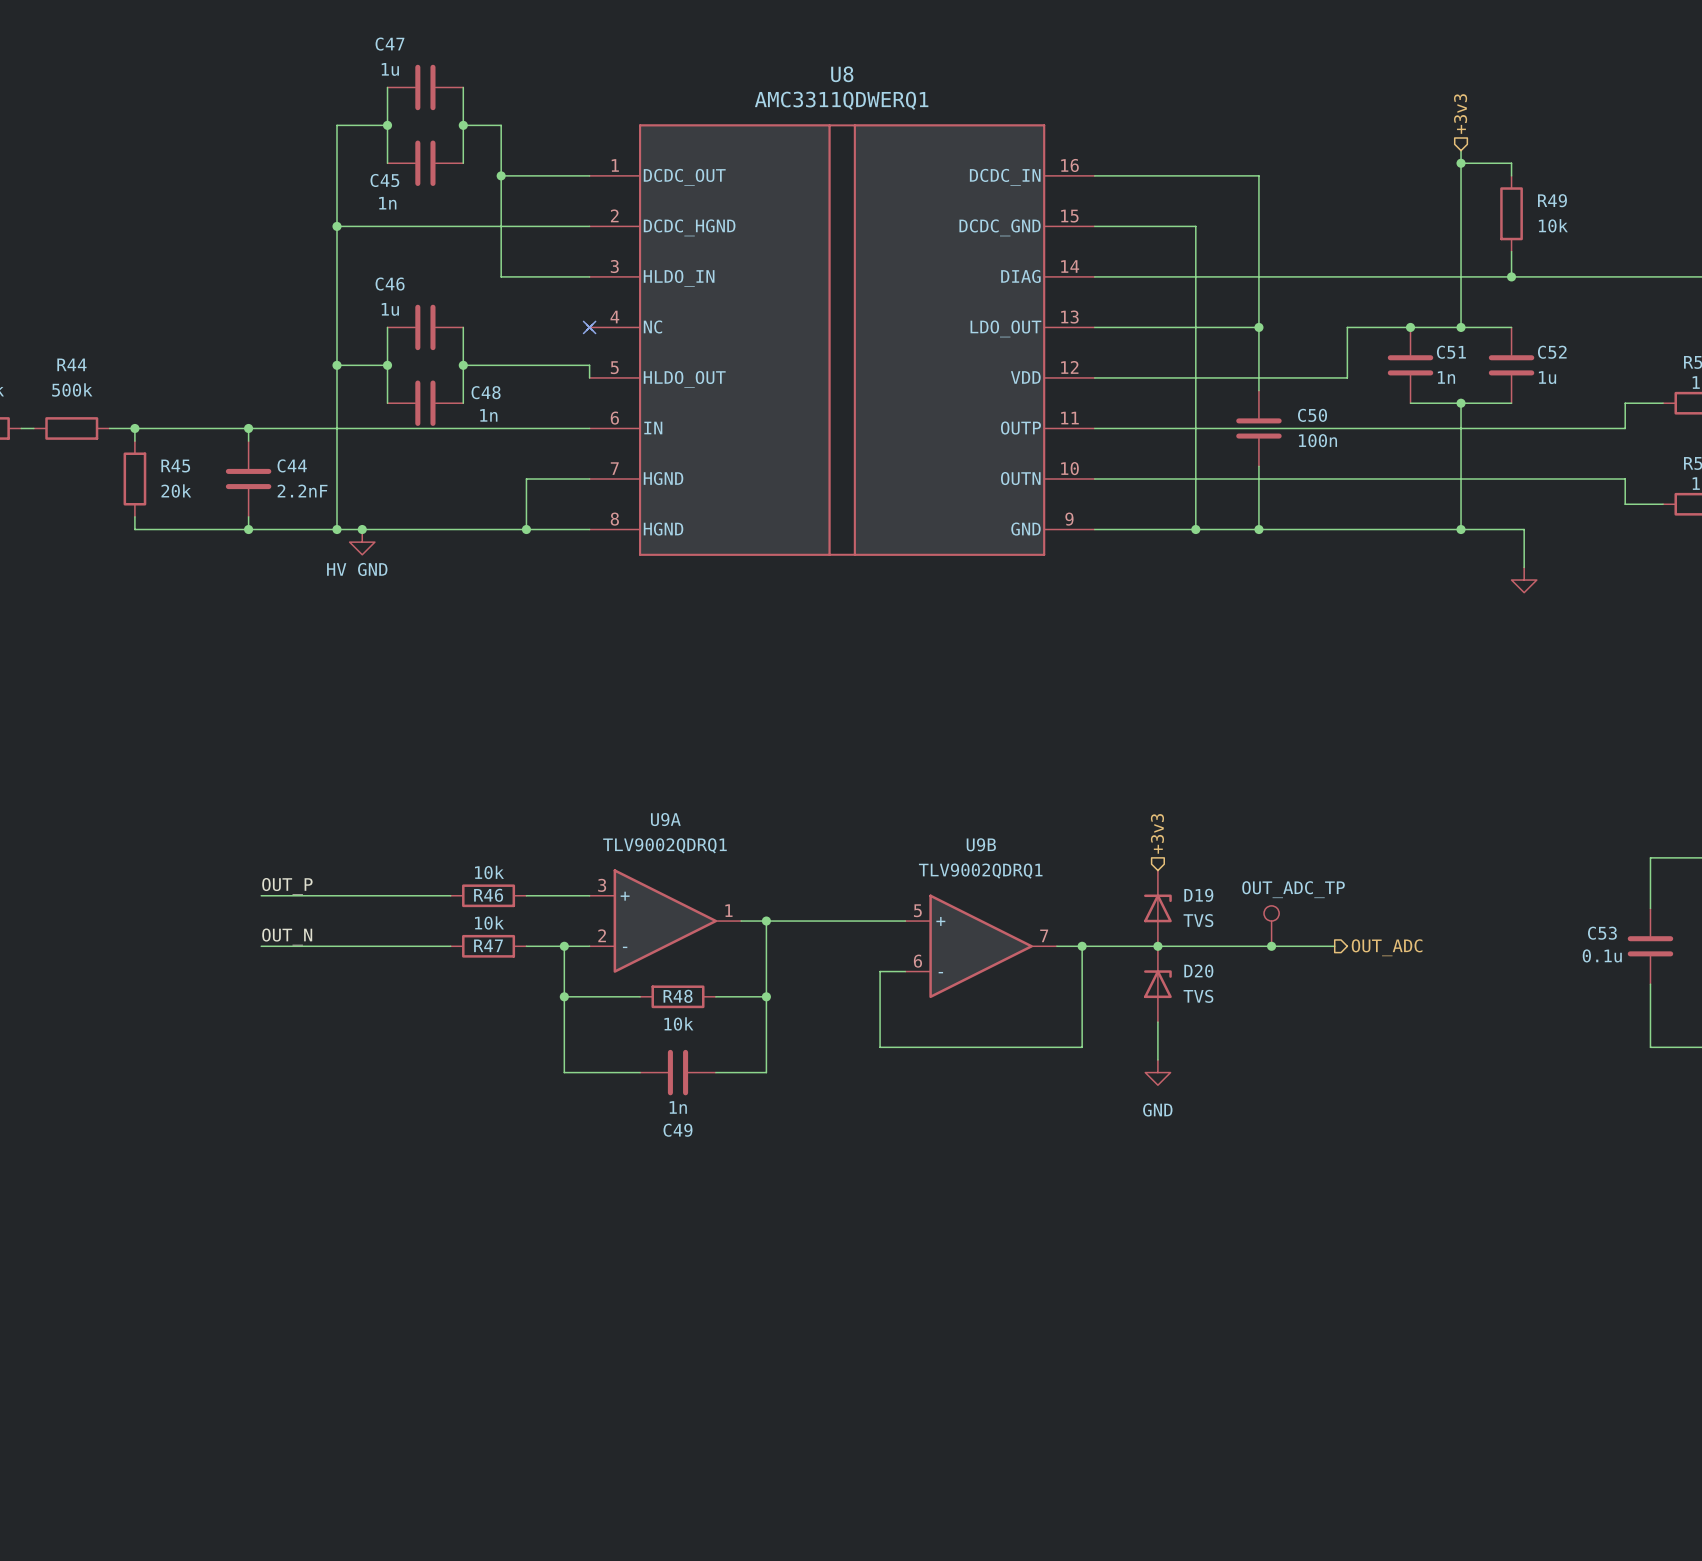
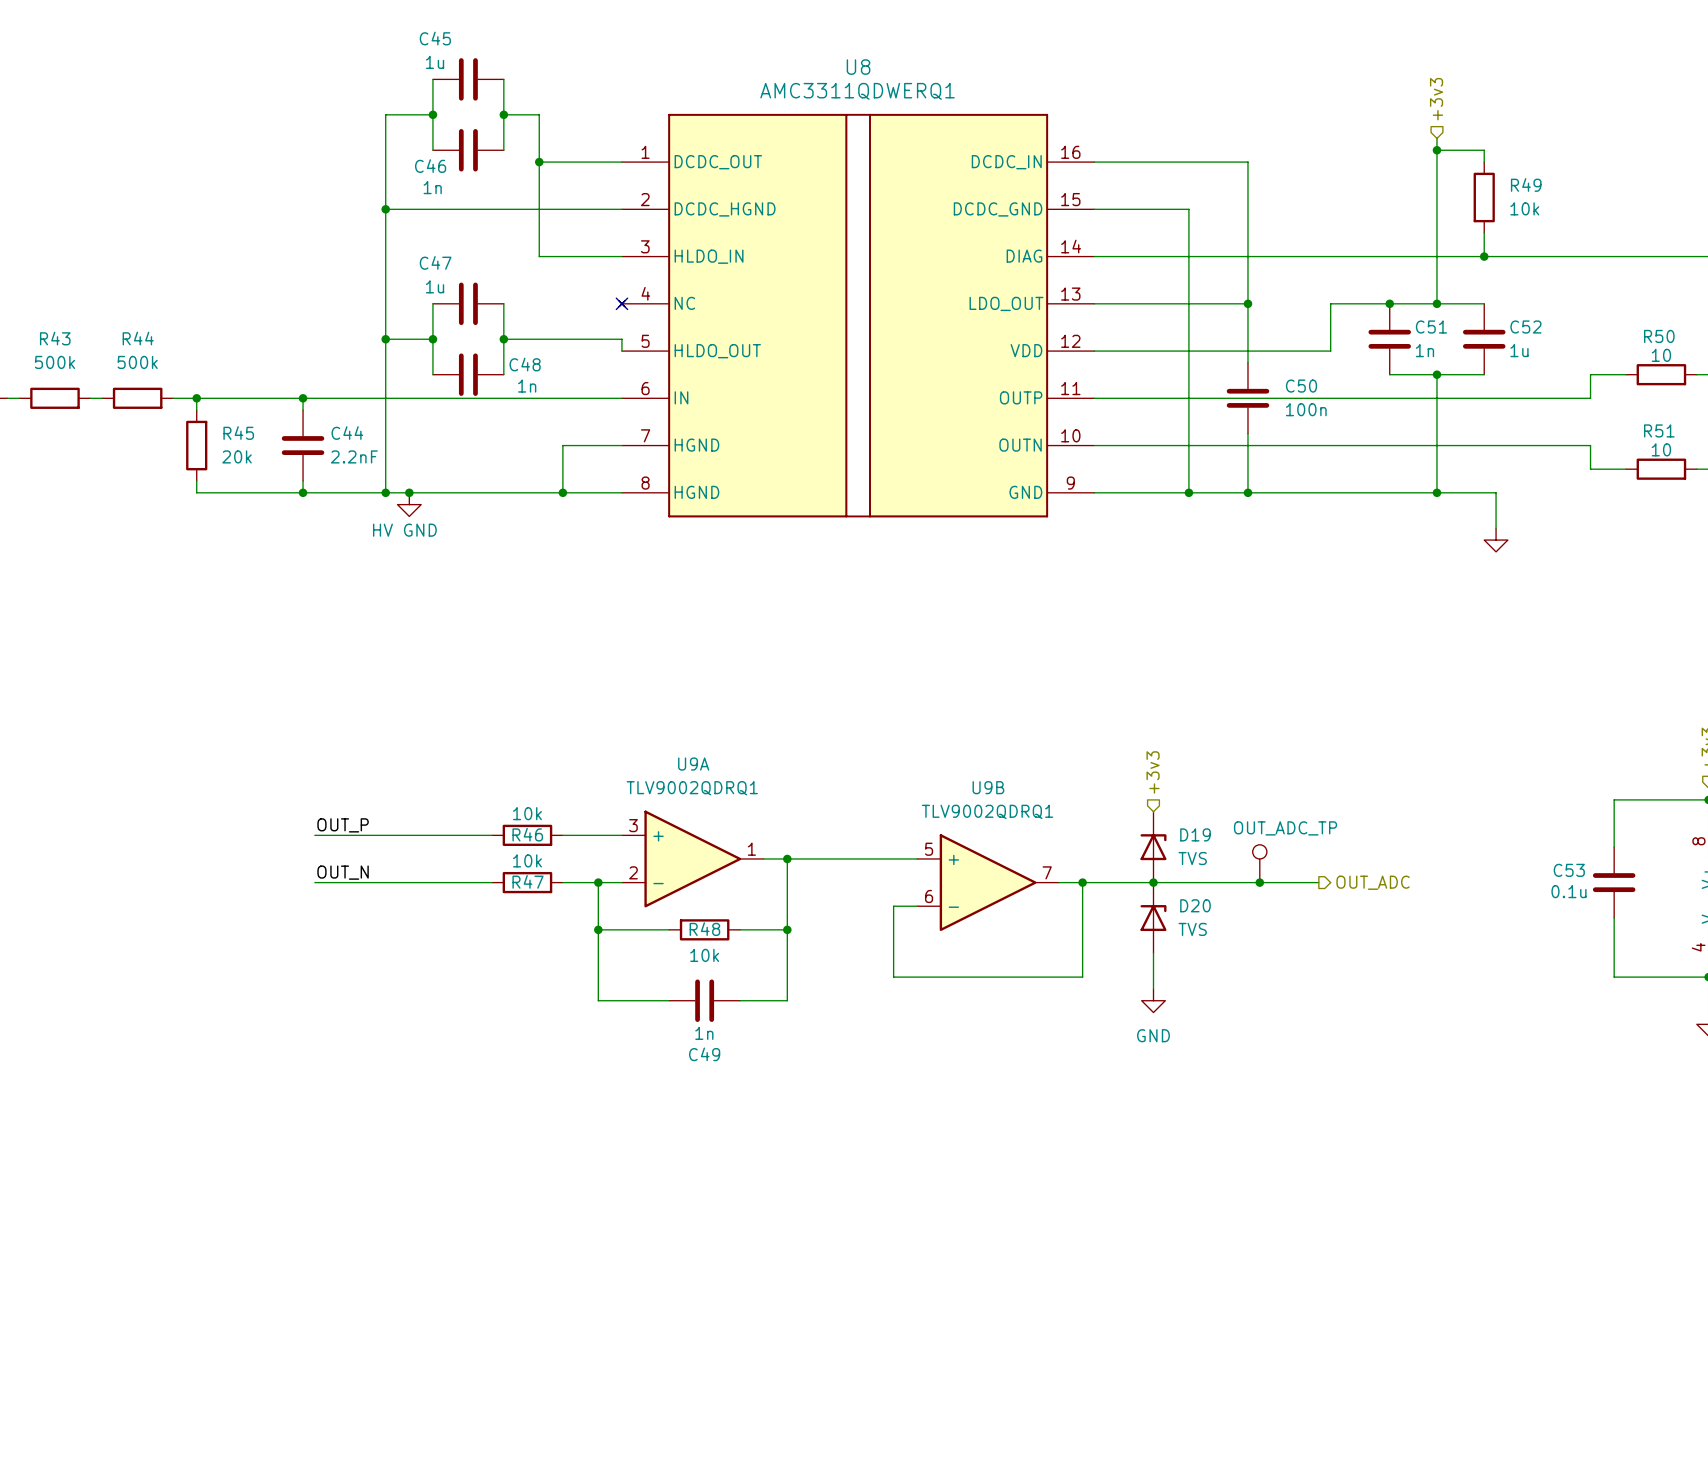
C47 name: C47 (389, 44) -> C45 (435, 38)
C45 name: C45 (384, 180) -> C46 (430, 166)
C46 name: C46 (390, 284) -> C47 (435, 262)

